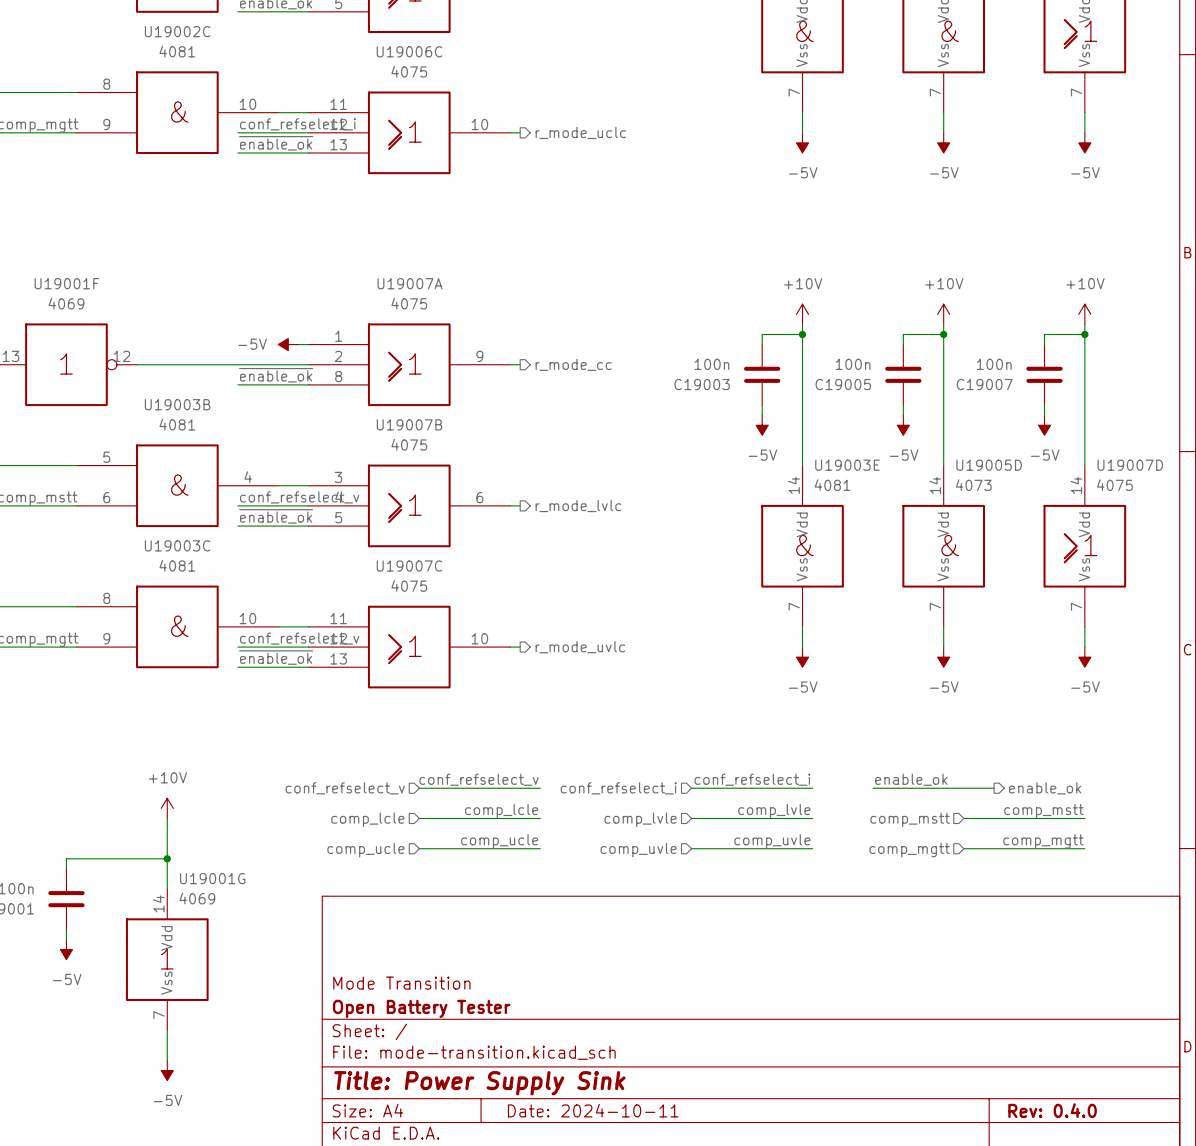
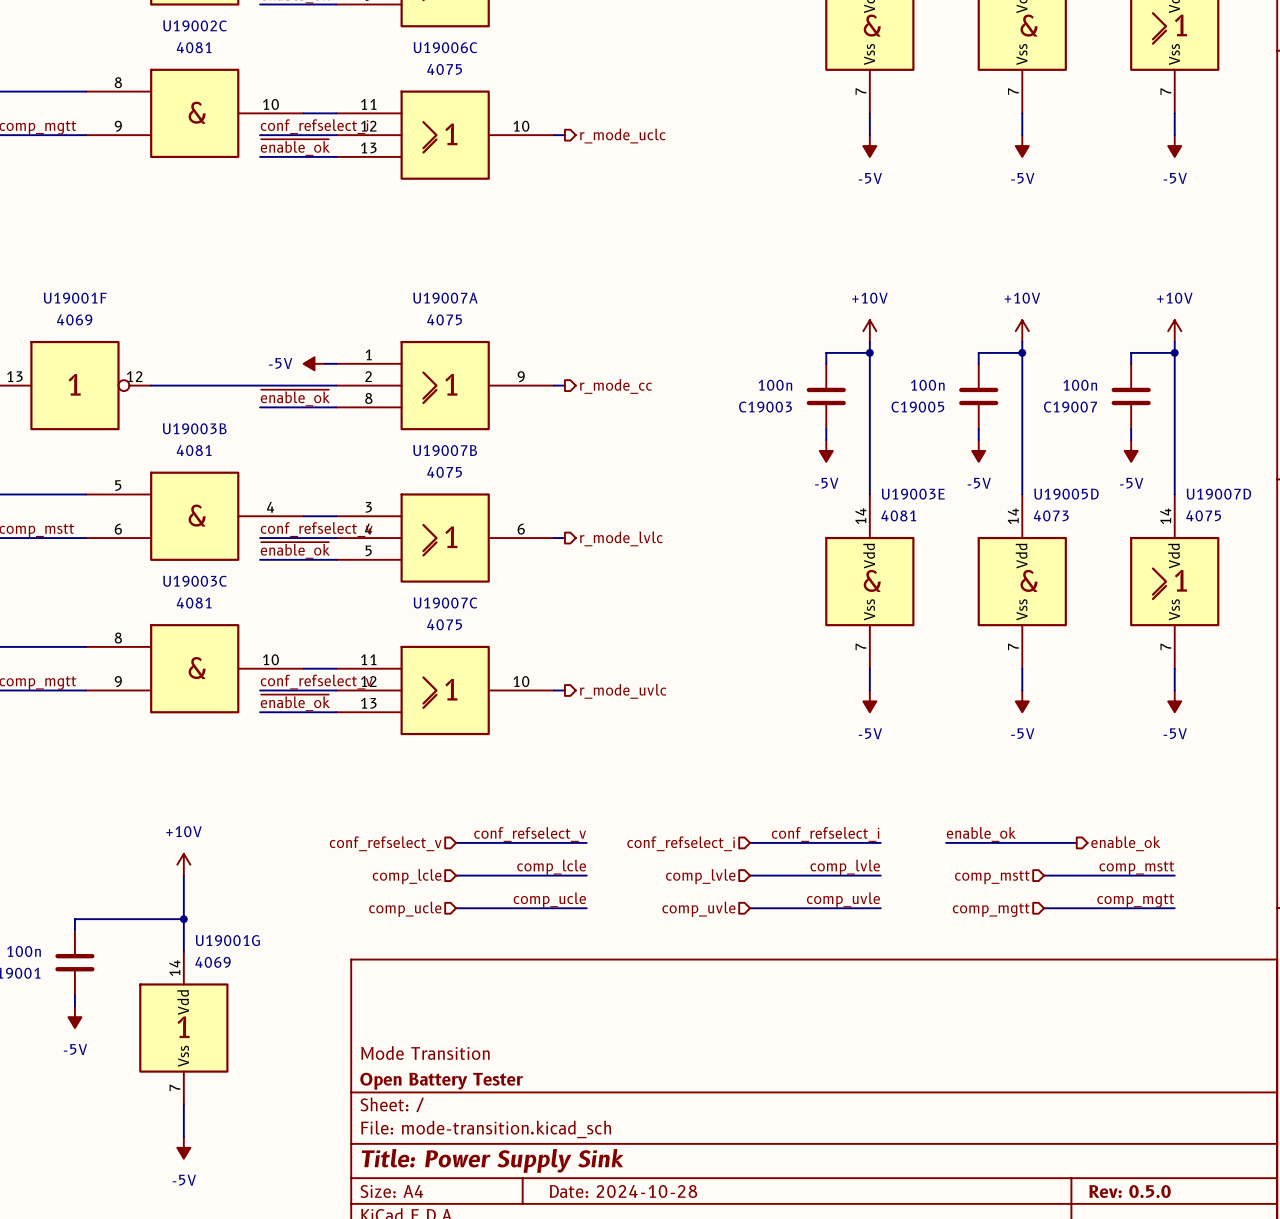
title block: Date: 2024-10-11 (593, 1110) -> Date: 2024-10-28 (623, 1191)
title block: Rev: 0.4.0 (1052, 1110) -> Rev: 0.5.0 (1130, 1191)

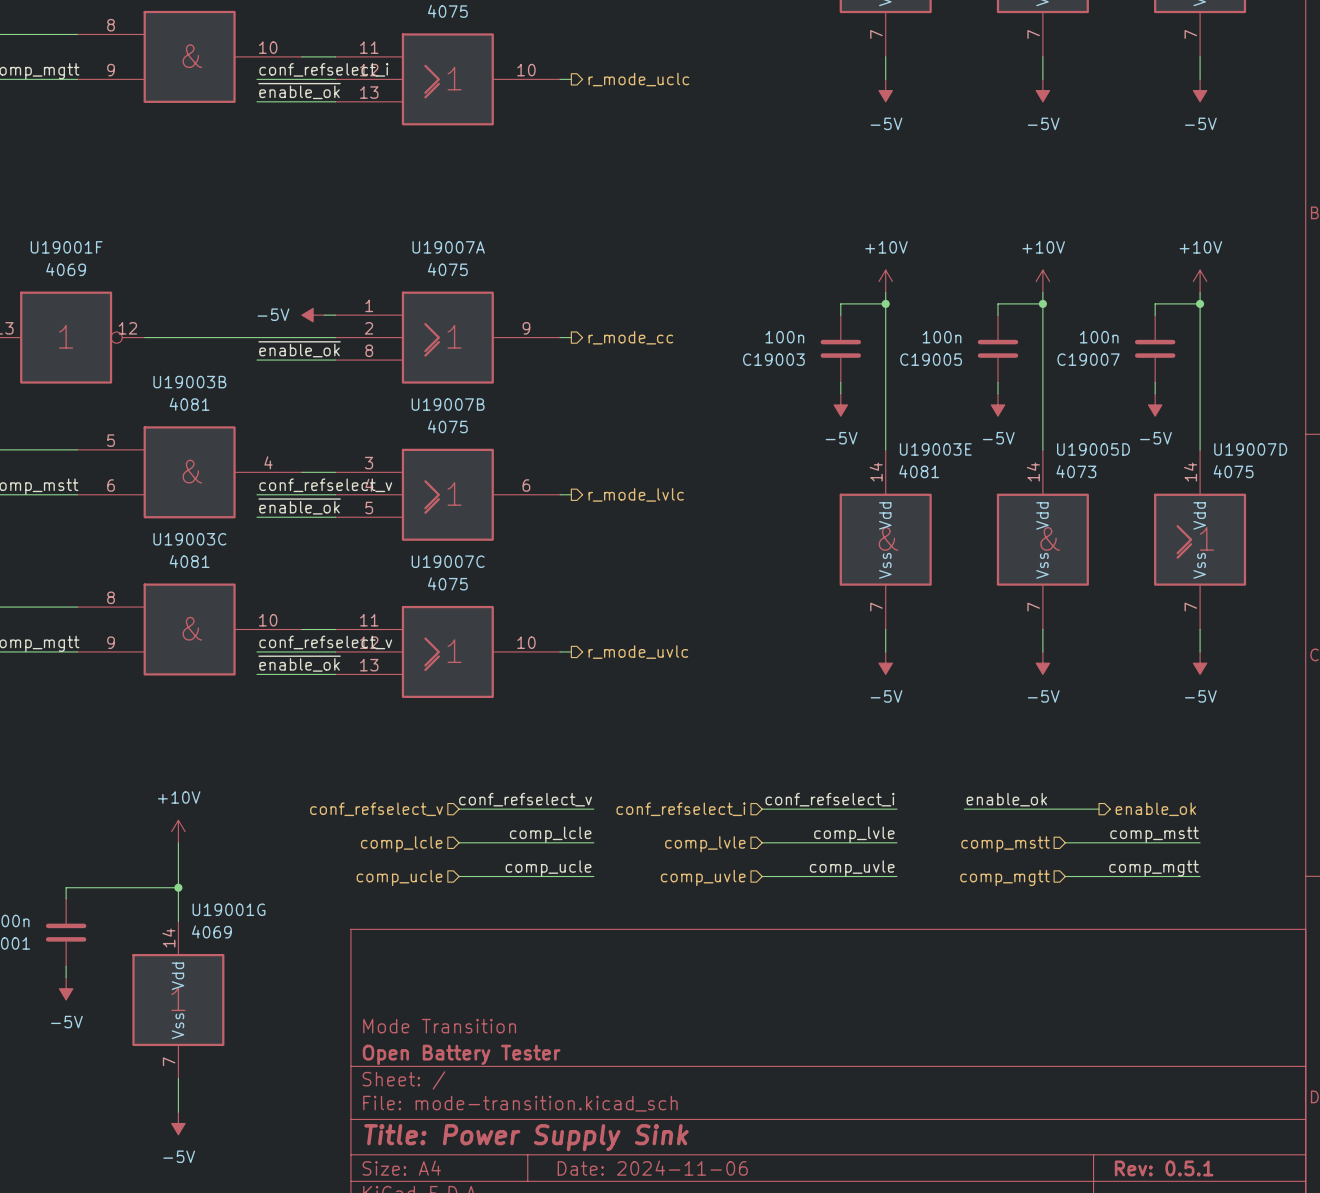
title block: Date: 2024-10-28 (623, 1191) -> Date: 2024-11-06 (652, 1168)
title block: Rev: 0.5.0 (1130, 1191) -> Rev: 0.5.1 (1164, 1168)

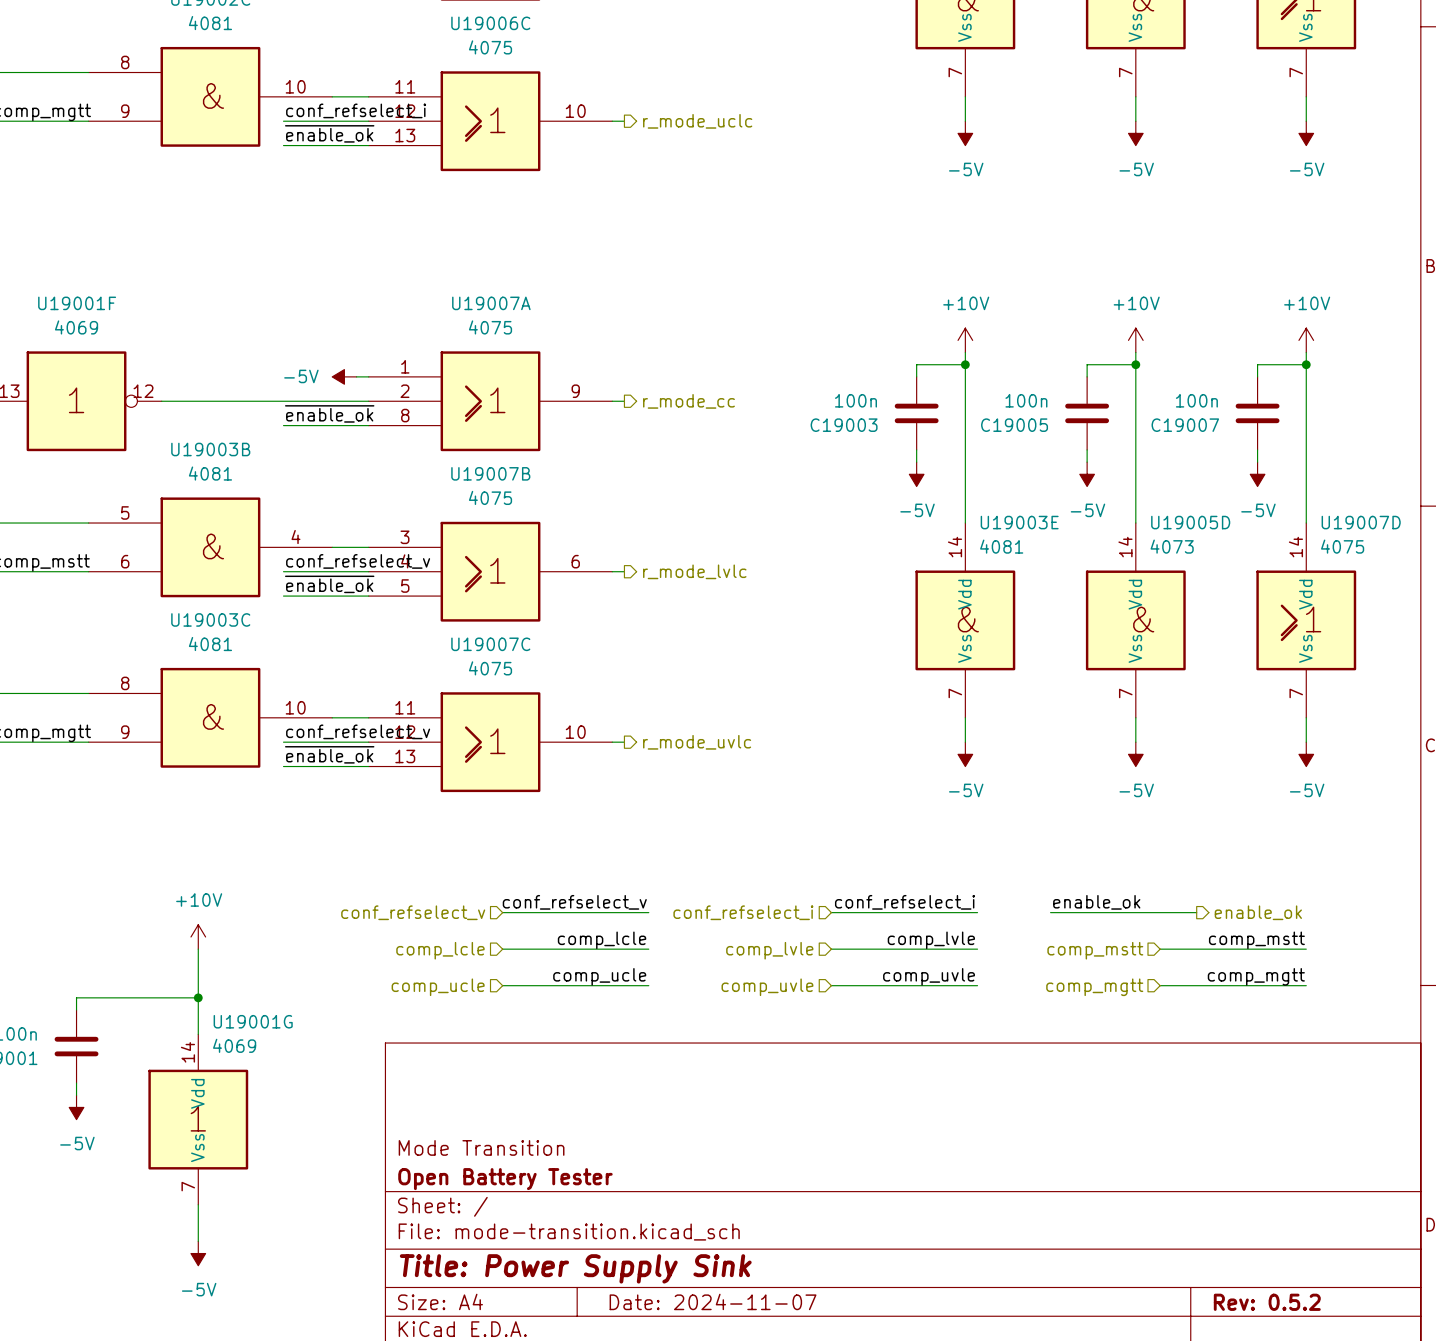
title block: Date: 2024-11-06 (652, 1168) -> Date: 2024-11-07 (713, 1301)
title block: Rev: 0.5.1 (1164, 1168) -> Rev: 0.5.2 (1267, 1302)

